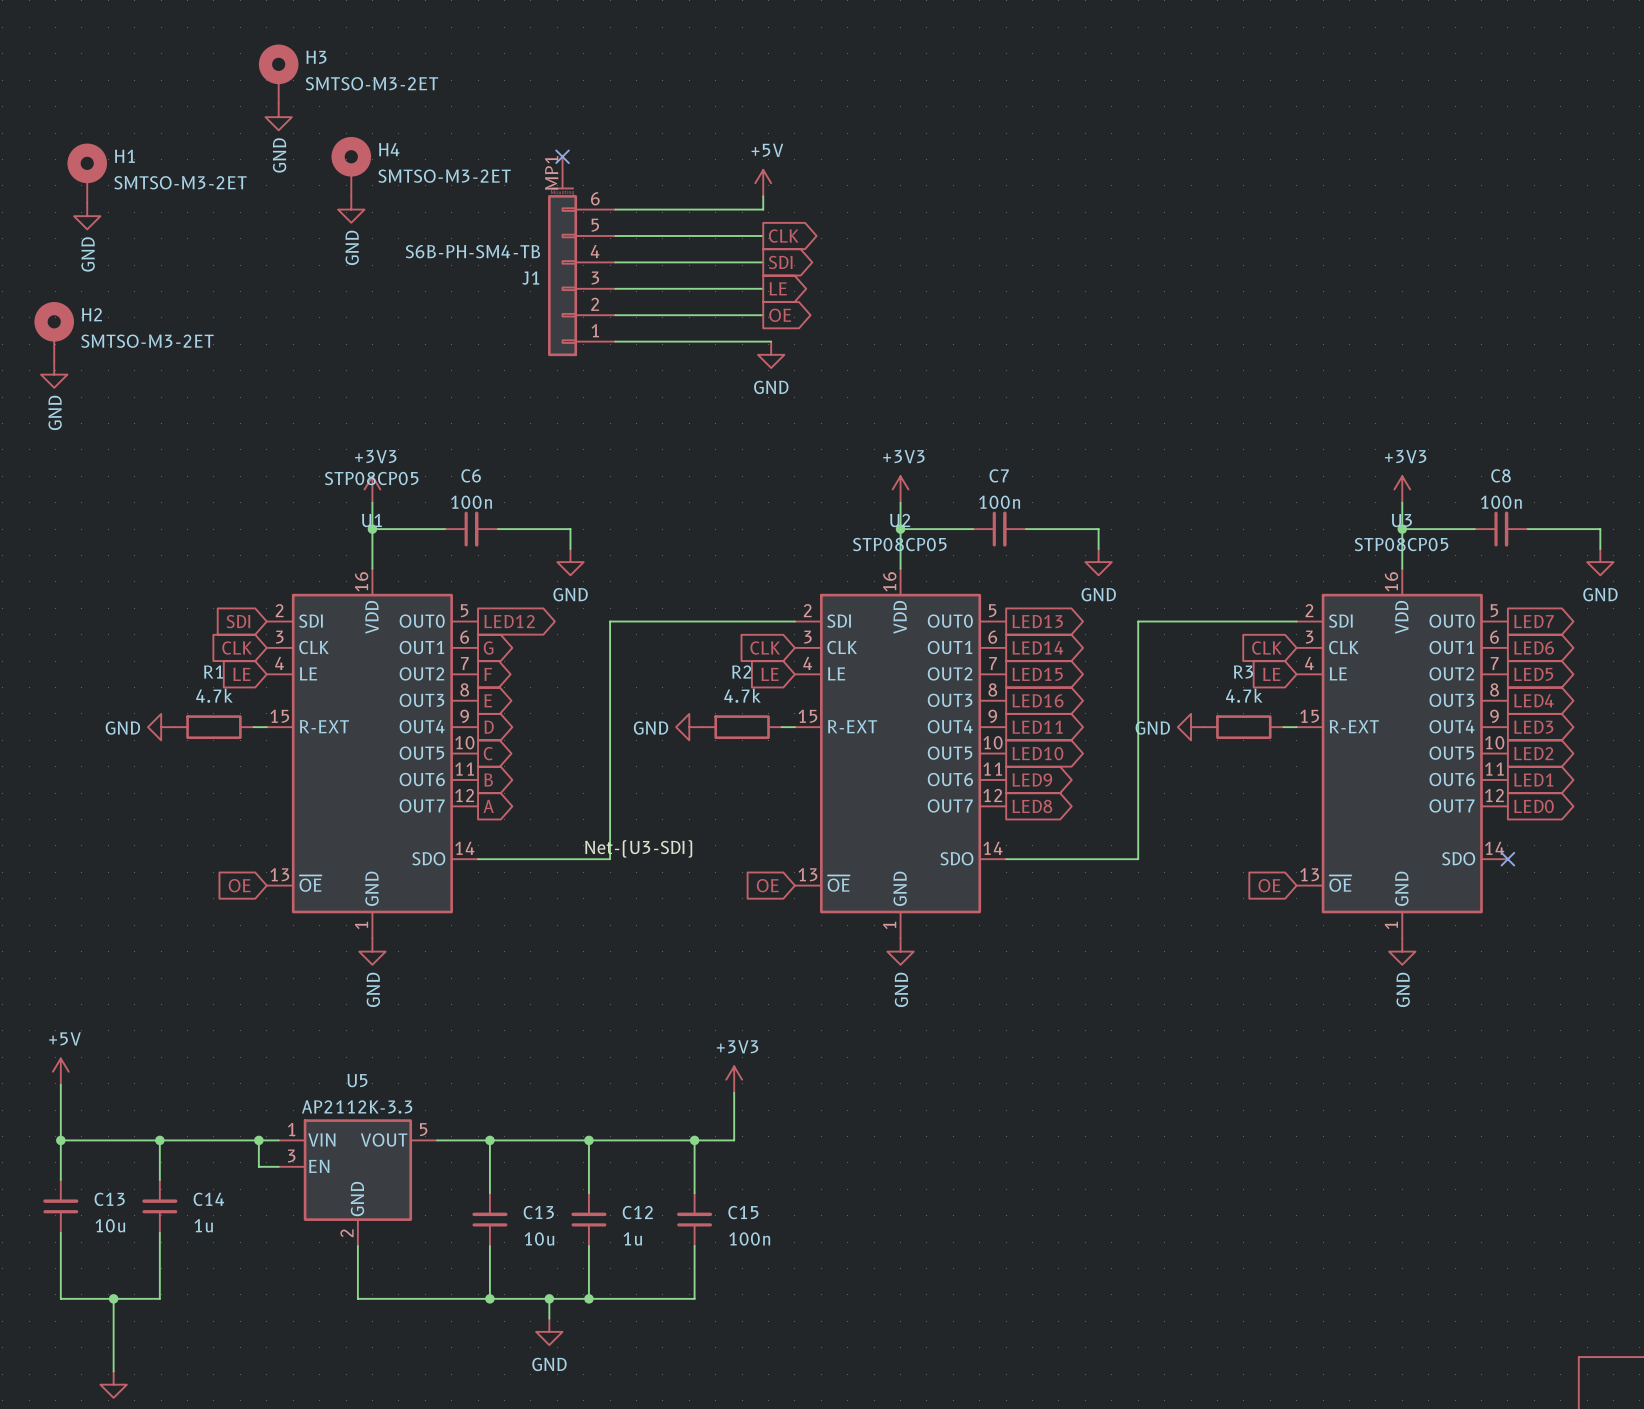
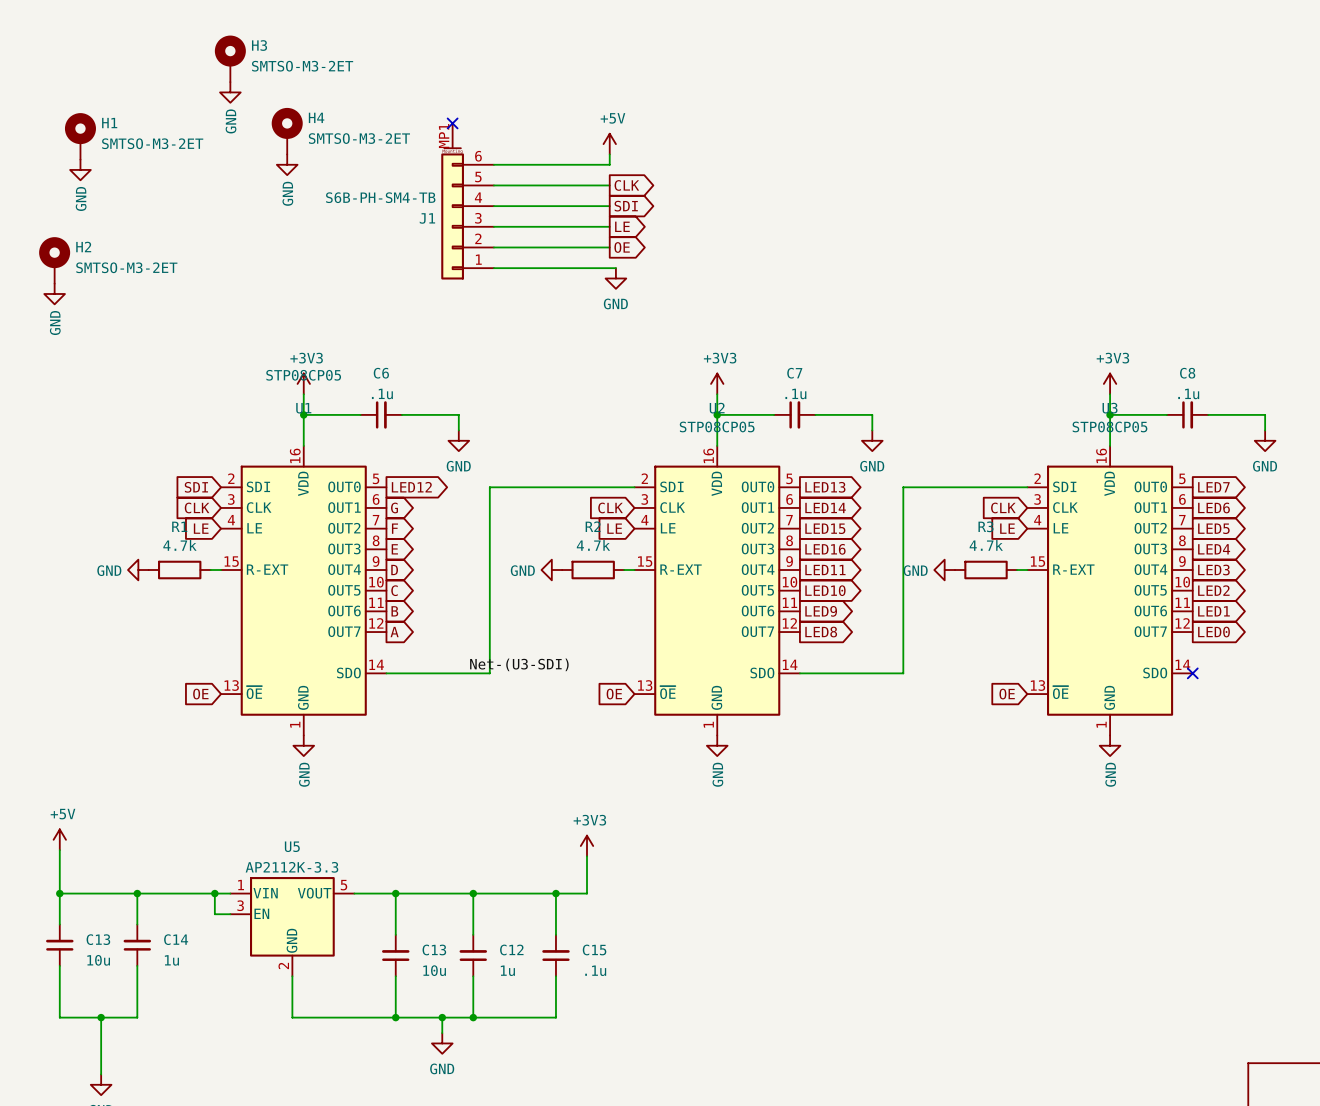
C6 value: 100n (471, 502) -> .1u (382, 393)
C7 value: 100n (999, 502) -> .1u (795, 393)
C8 value: 100n (1501, 502) -> .1u (1188, 393)
C15 value: 100n (749, 1238) -> .1u (595, 970)

